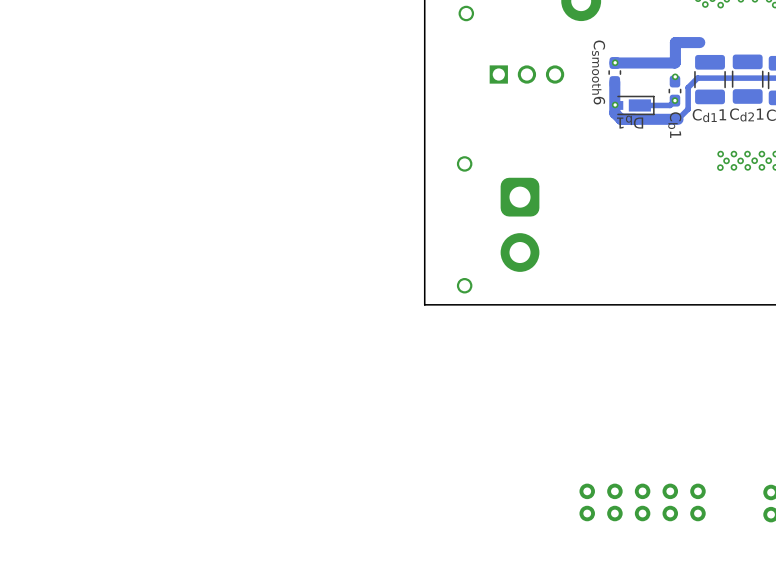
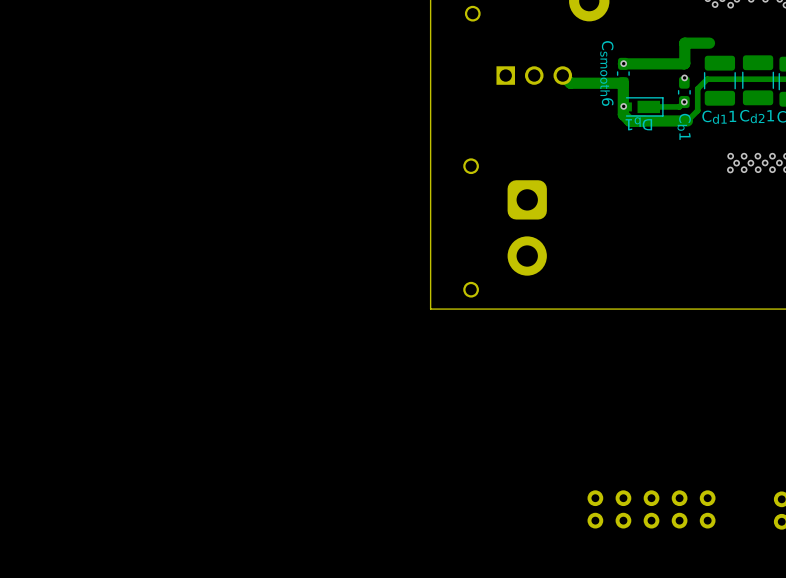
track: none -> (562, 75) (570, 83) (623, 83)

